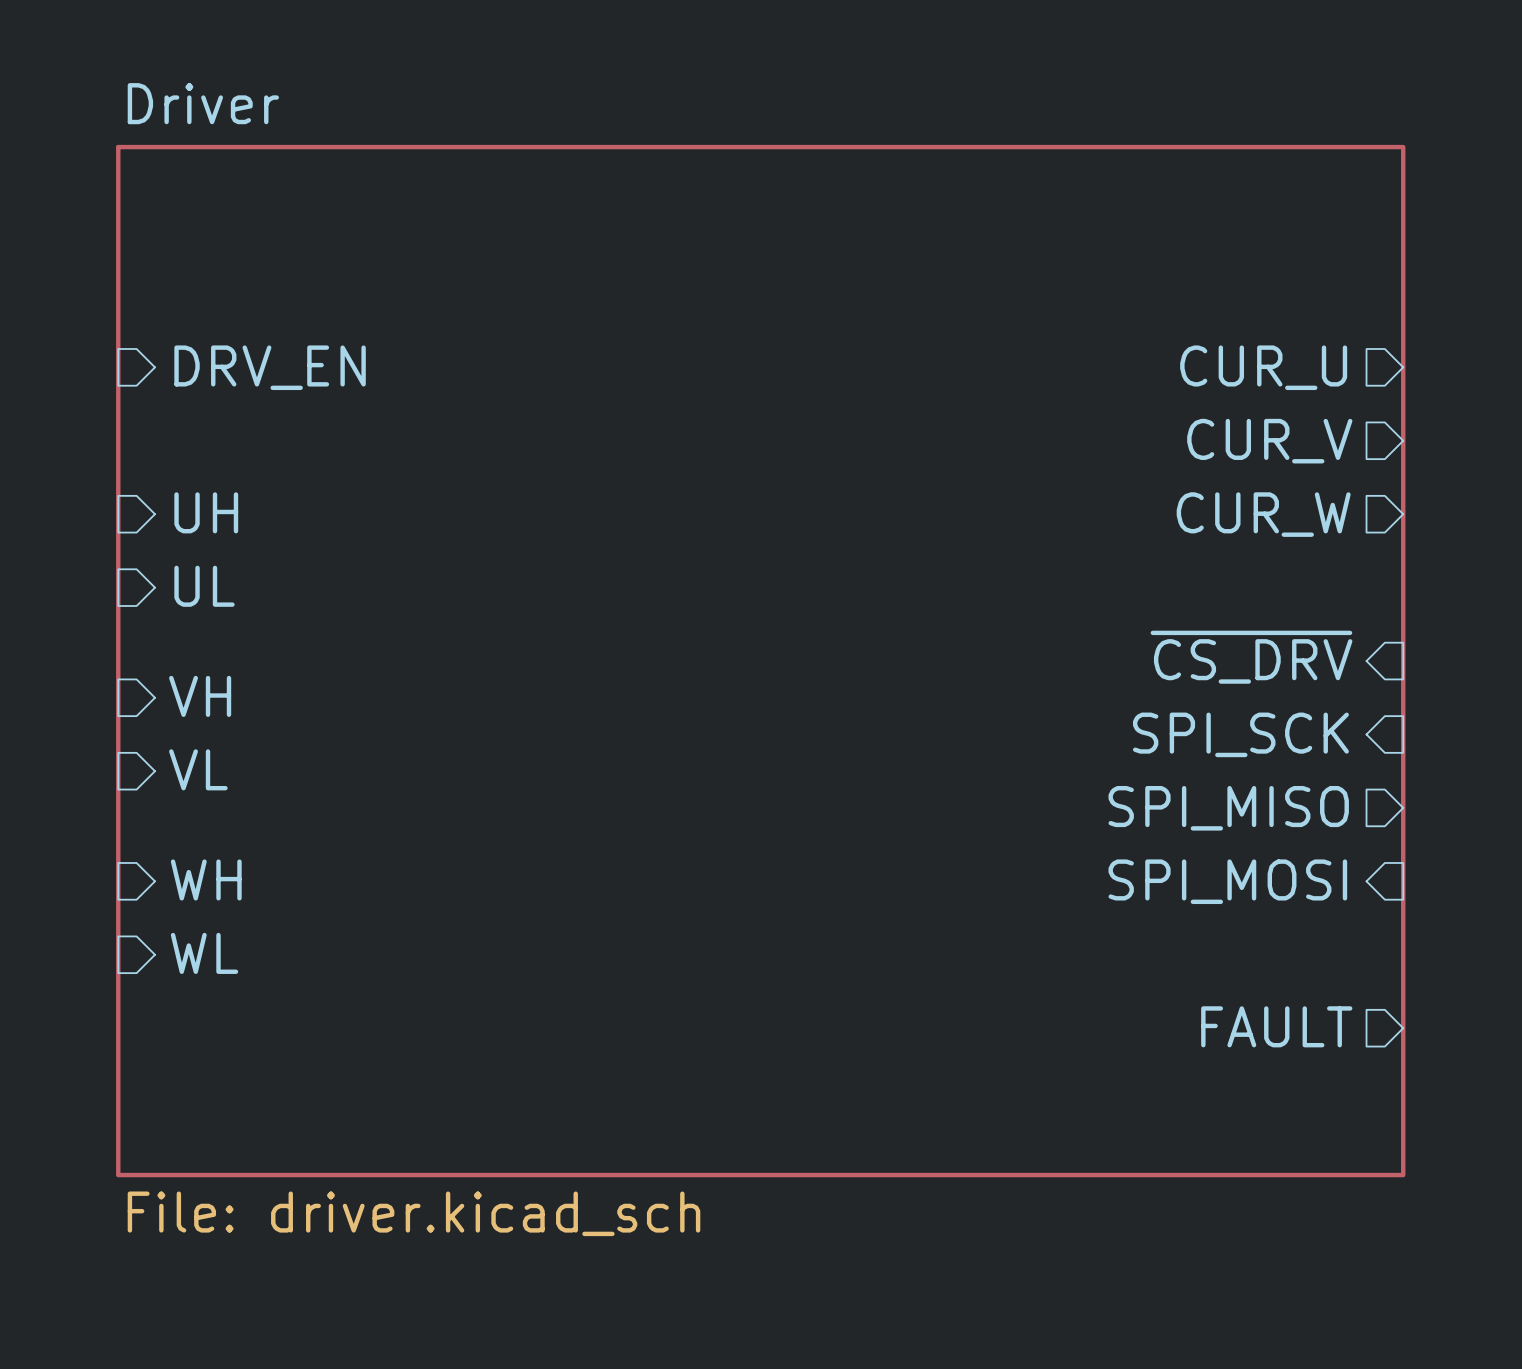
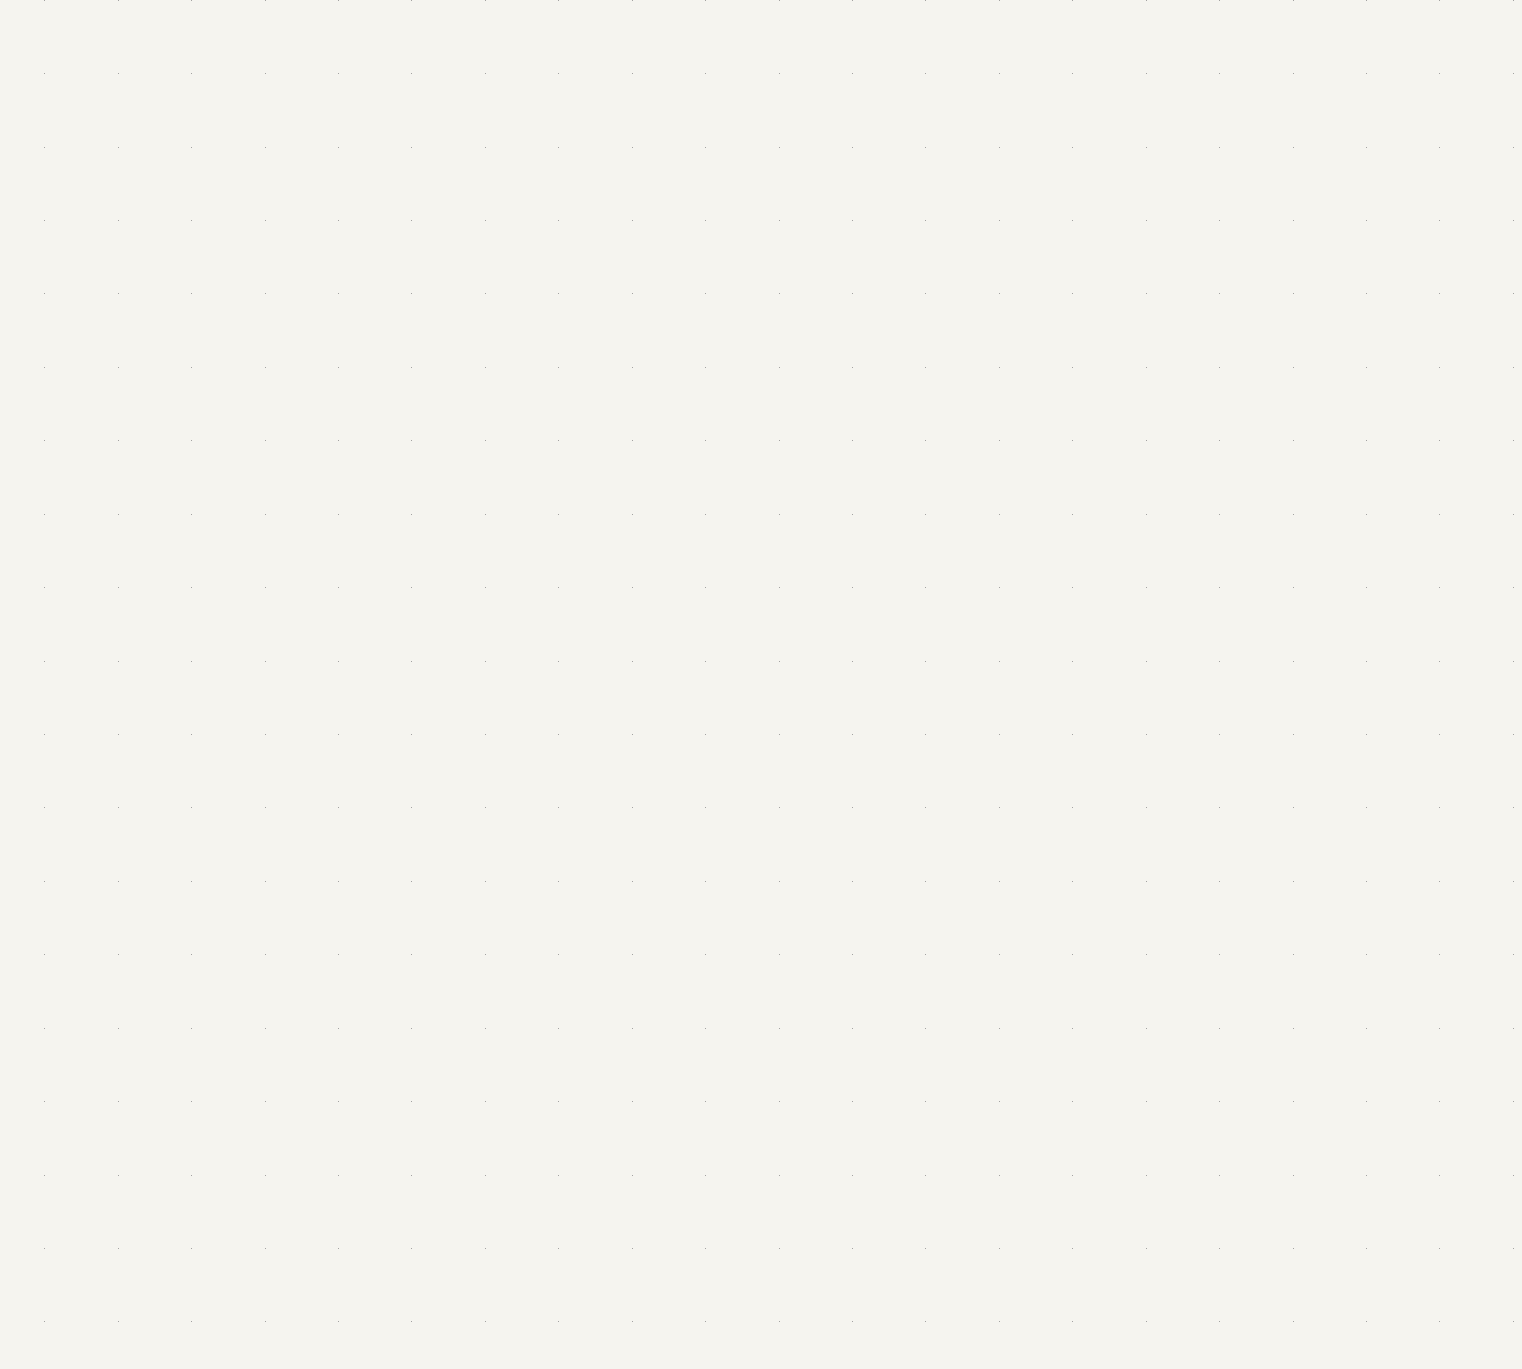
sheet pin: DRV_EN (270, 367) -> none
sheet pin: CUR_U (1263, 367) -> none
sheet pin: CUR_V (1269, 441) -> none
sheet pin: UH (206, 512) -> none
sheet pin: CUR_W (1263, 514) -> none
sheet pin: UL (204, 586) -> none
sheet pin: ~{CS_DRV} (1251, 657) -> none
sheet Driver: File: driver.kicad_sch (760, 661) -> none
sheet pin: VH (200, 696) -> none
sheet pin: SPI_SCK (1240, 734) -> none
sheet pin: VL (198, 769) -> none
sheet pin: SPI_MISO (1228, 808) -> none
sheet pin: WH (206, 879) -> none
sheet pin: SPI_MOSI (1227, 881) -> none
sheet pin: WL (204, 953) -> none
sheet pin: FAULT (1276, 1026) -> none

